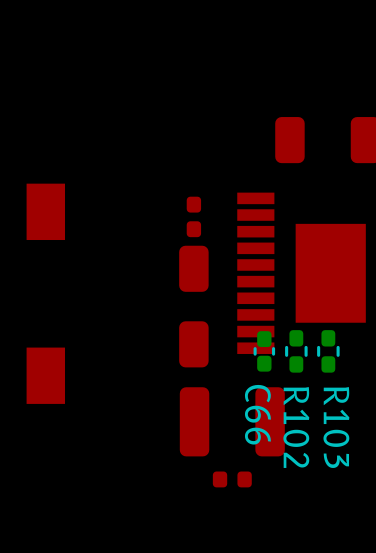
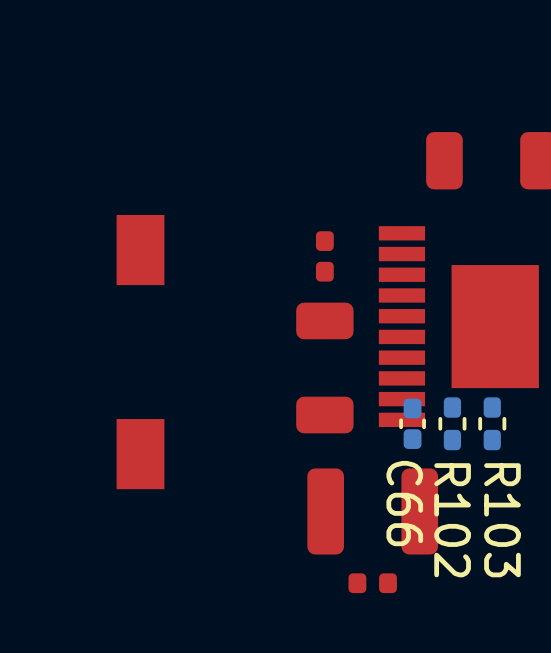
part footprint: [179, 245, 209, 368] -> [296, 302, 354, 434]

